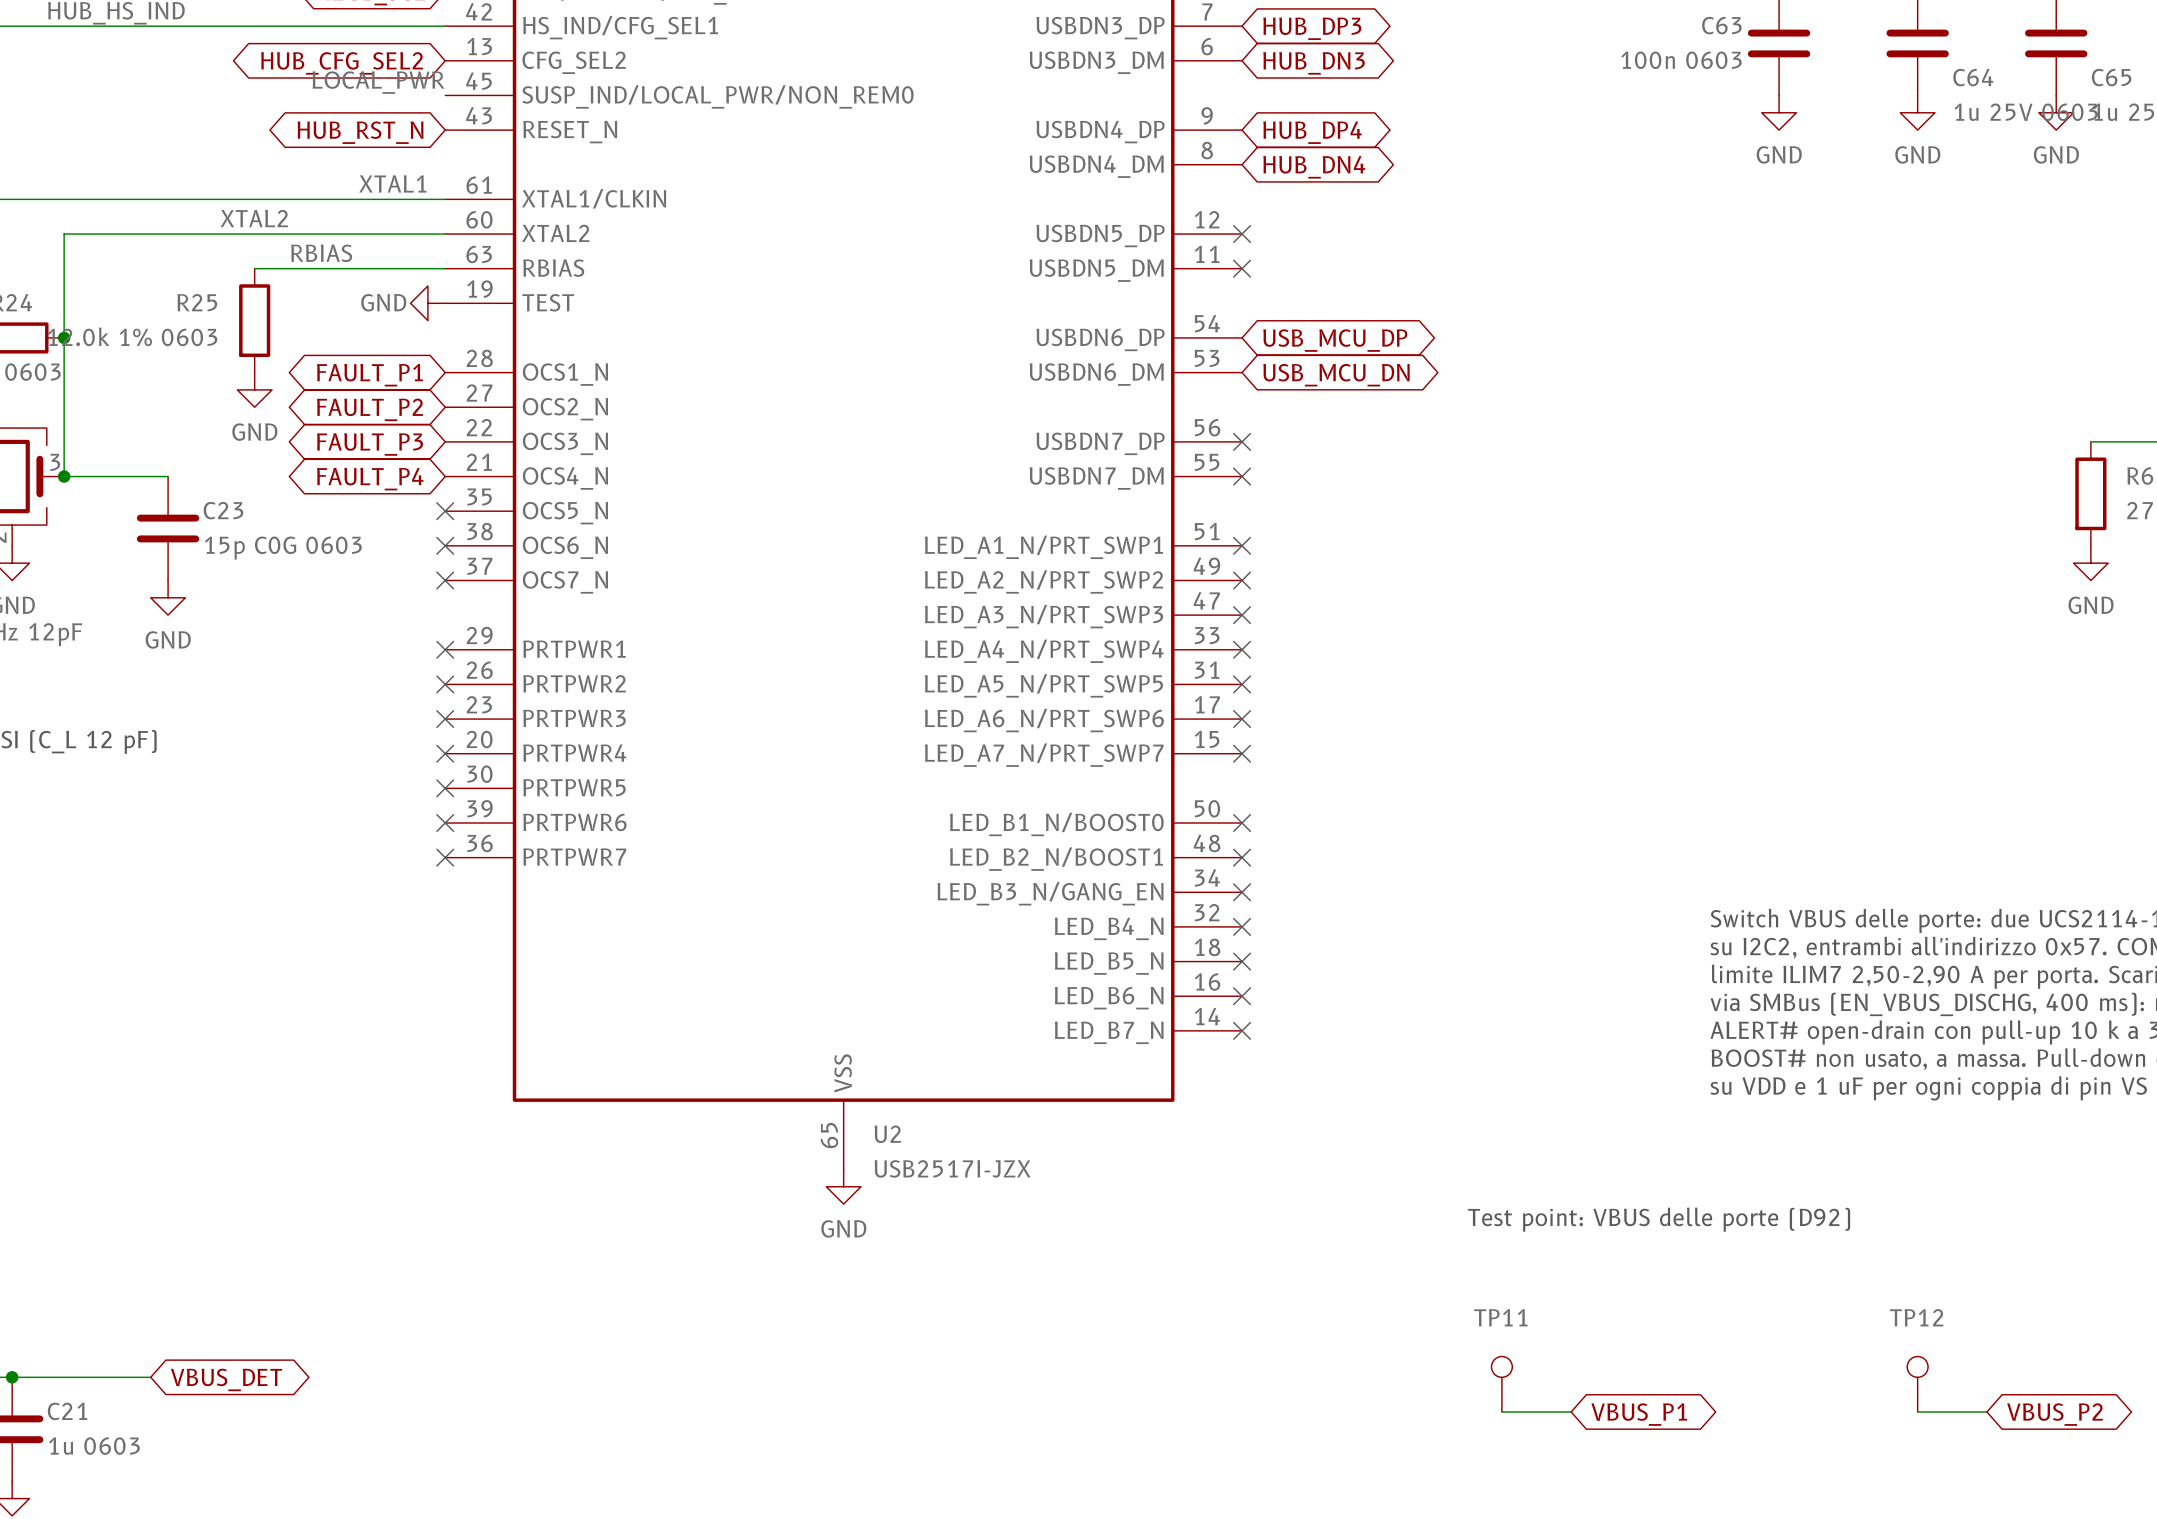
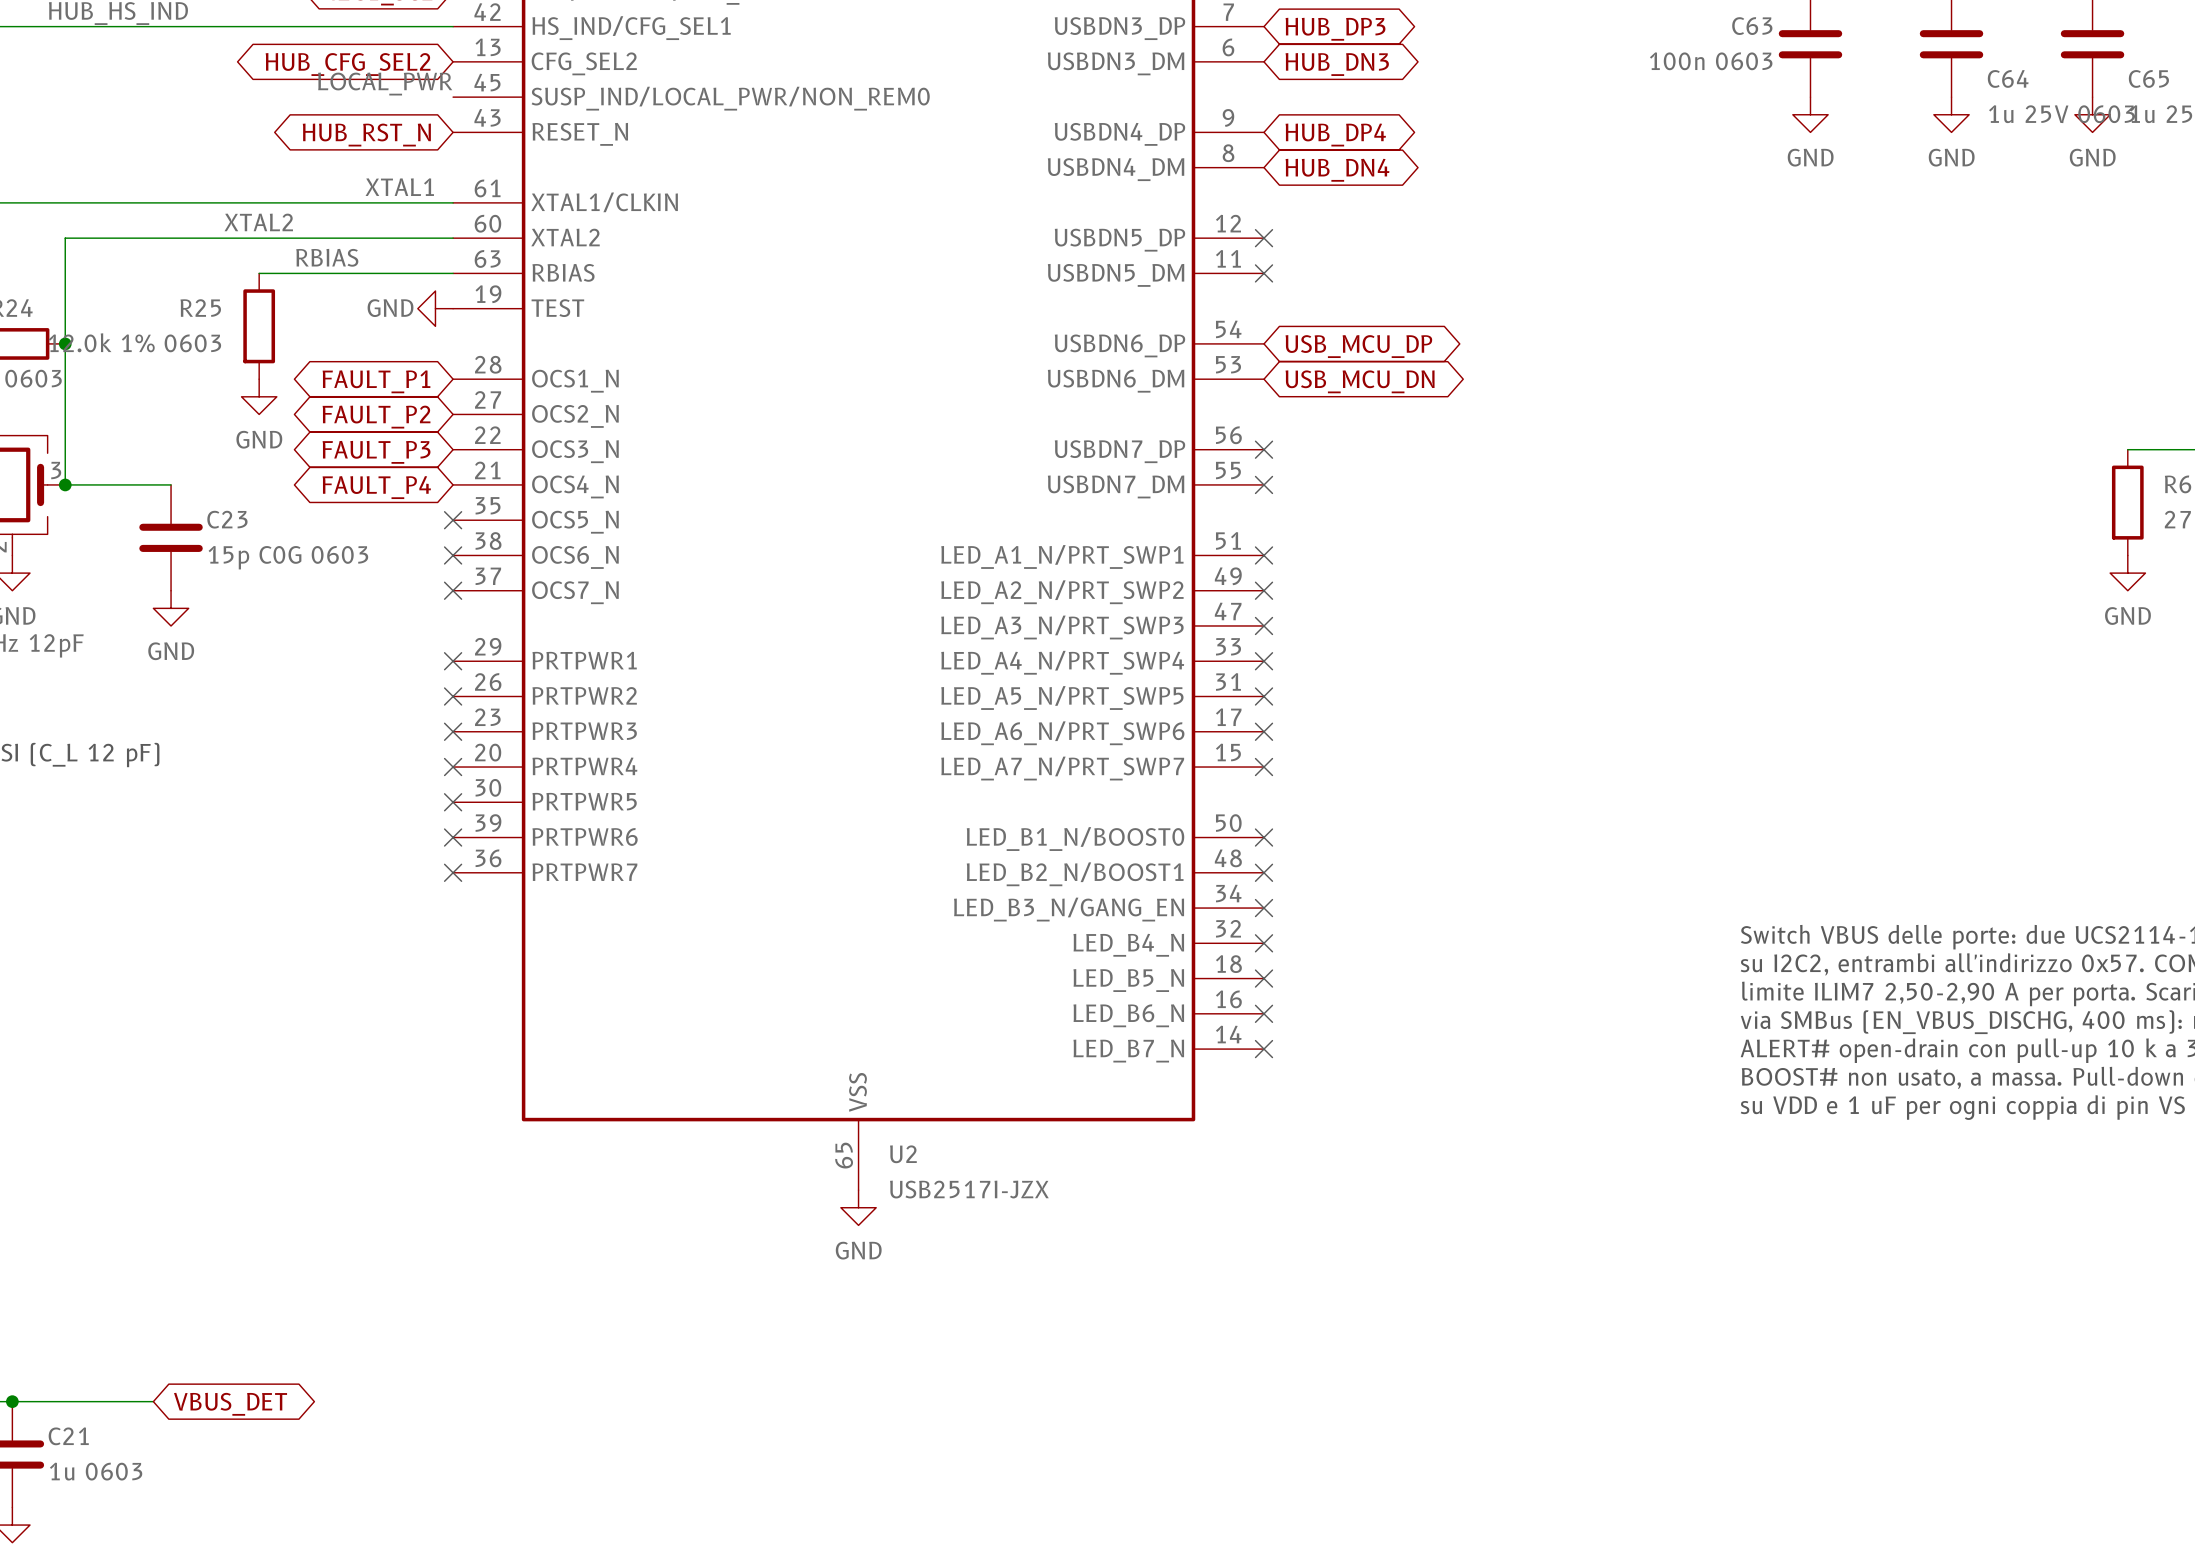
text: Test point: VBUS delle porte (D92) (1659, 1219) -> none
TP11: (1501, 1384) -> none
TP12: (1917, 1384) -> none
wire: (1501, 1411) (1571, 1411) -> none
wire: (1917, 1411) (1986, 1411) -> none
global label: VBUS_P1 (1639, 1414) -> none
global label: VBUS_P2 (2054, 1414) -> none

